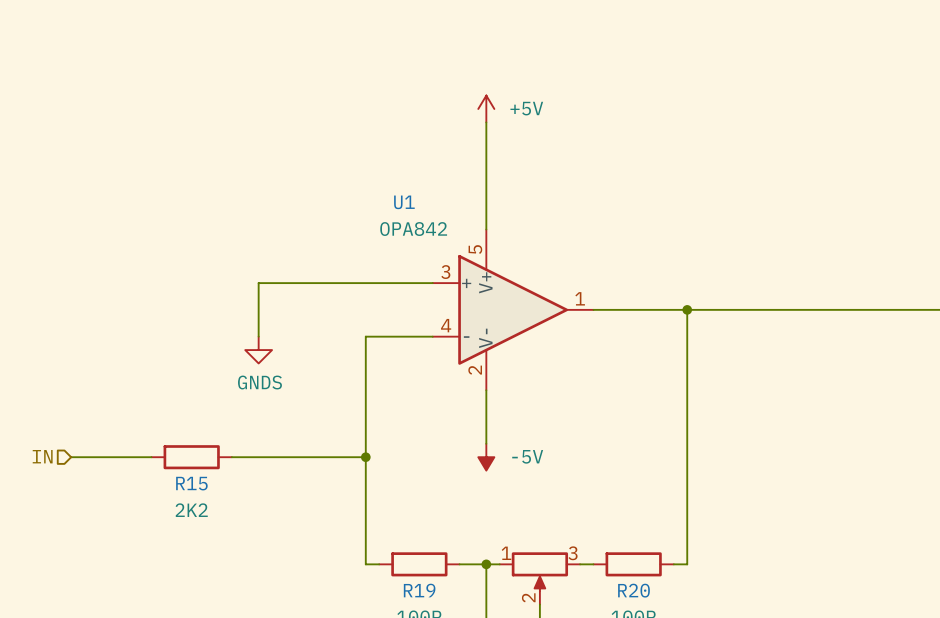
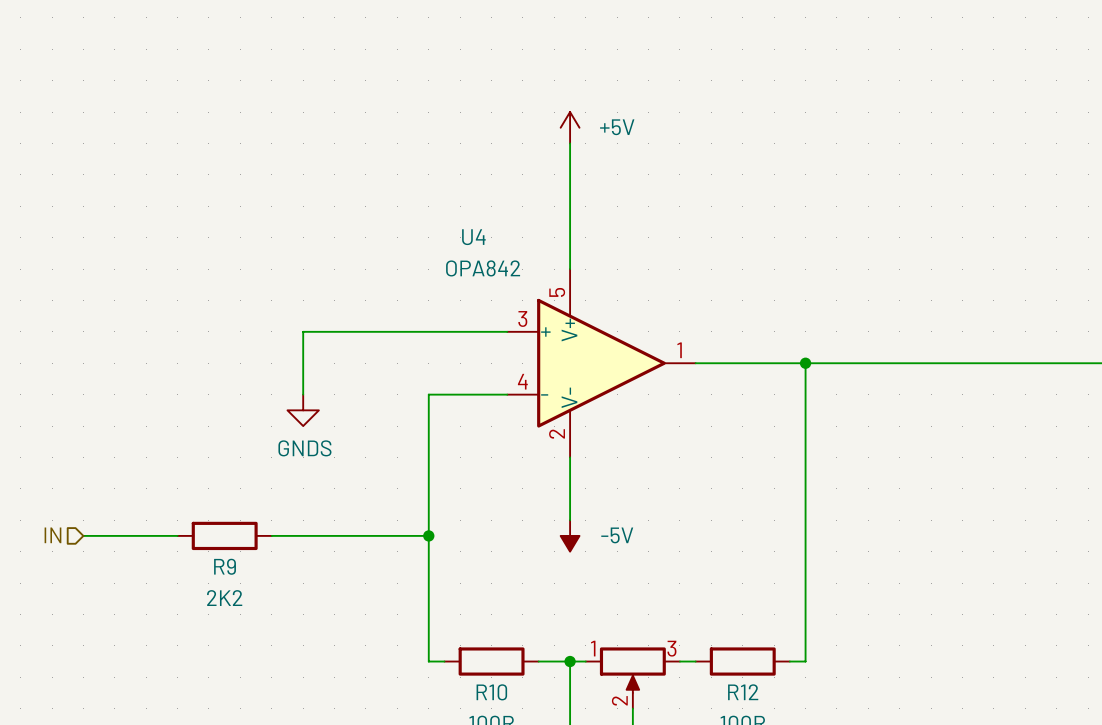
U1 name: U1 (404, 202) -> U4 (473, 237)
R15 name: R15 (191, 483) -> R9 (225, 566)
R19 name: R19 (419, 590) -> R10 (491, 692)
R20 name: R20 (633, 590) -> R12 (743, 692)

